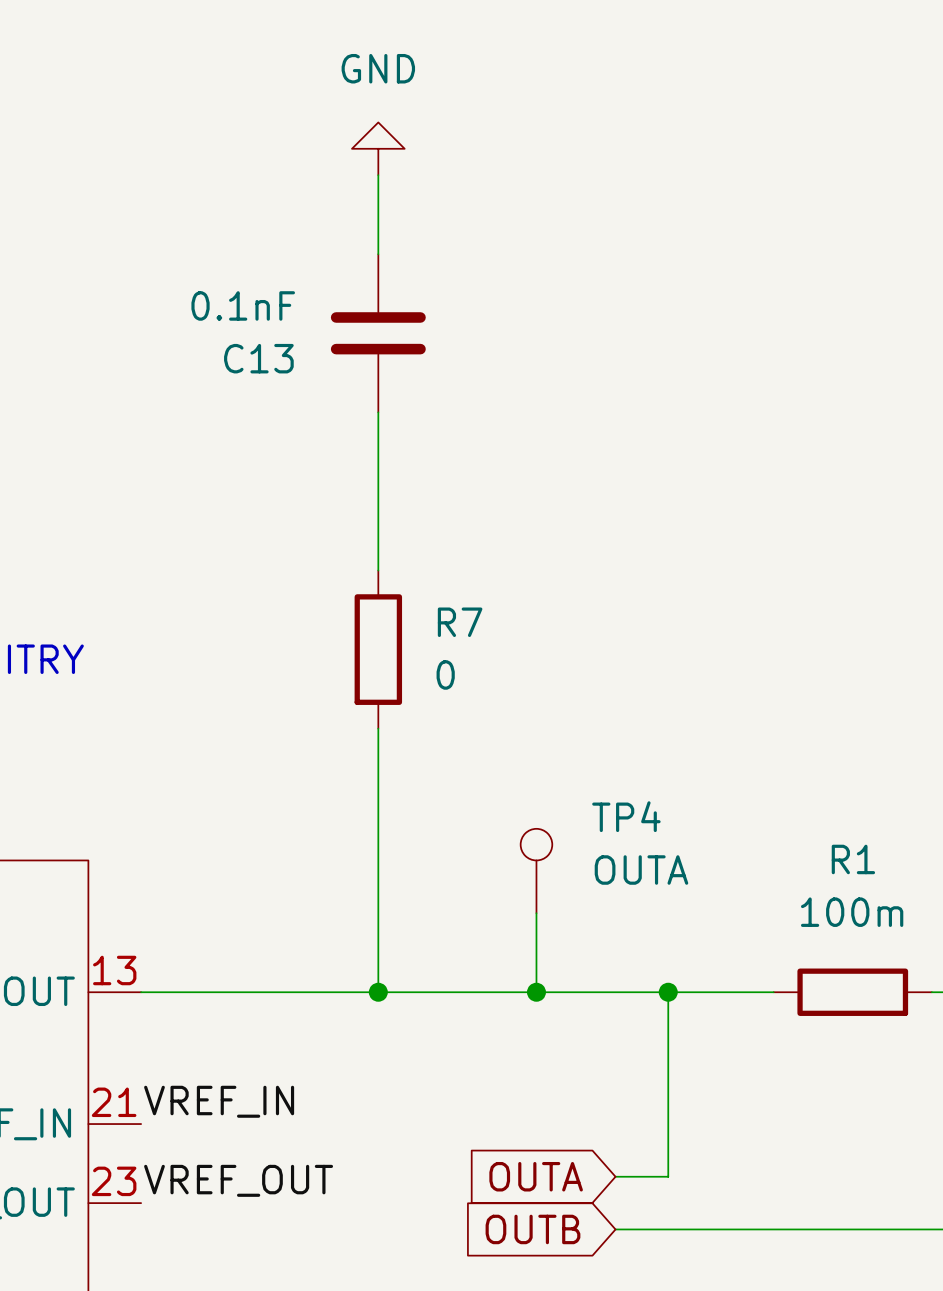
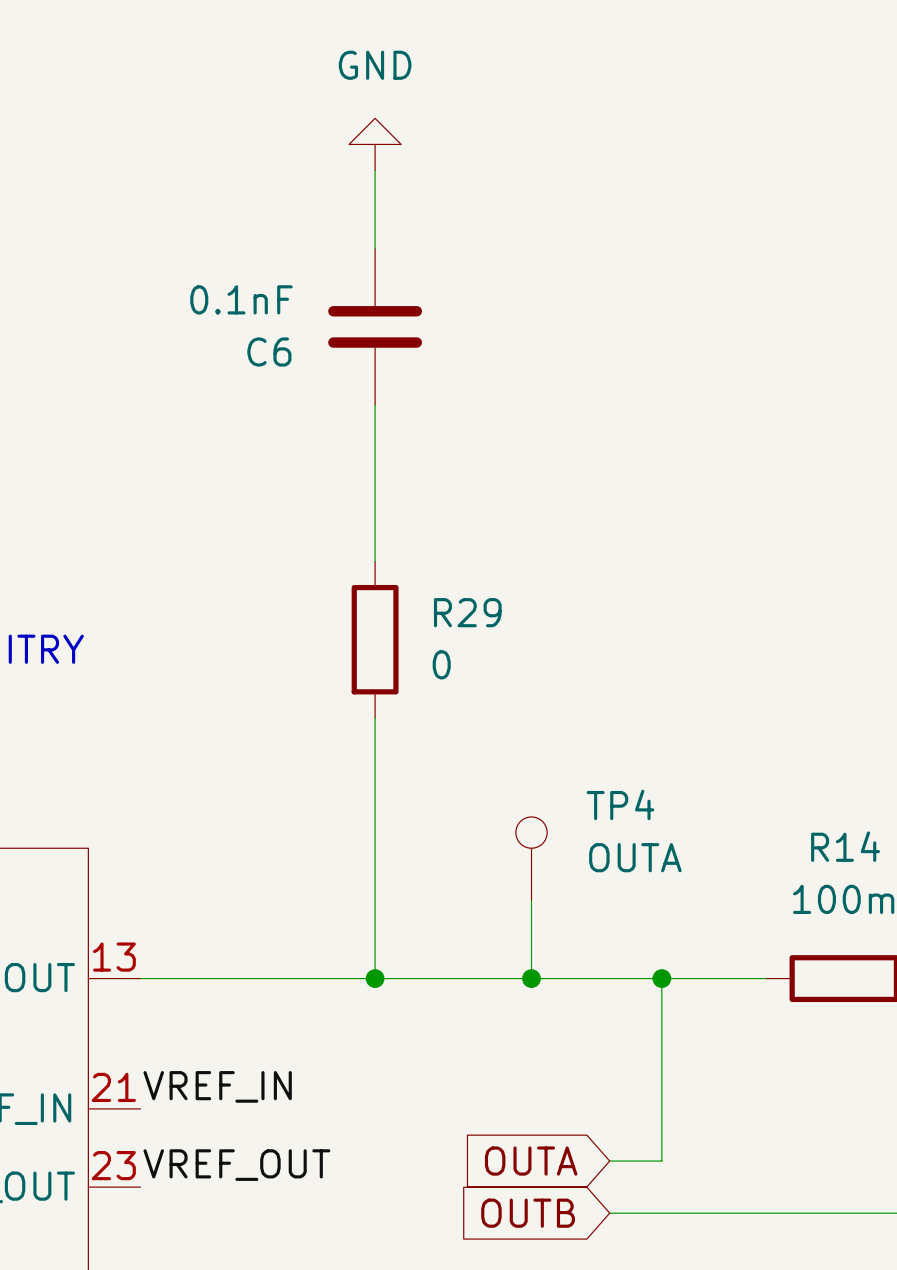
C13 name: C13 (258, 358) -> C6 (269, 352)
R7 name: R7 (460, 622) -> R29 (467, 612)
R1 name: R1 (853, 859) -> R14 (845, 846)

